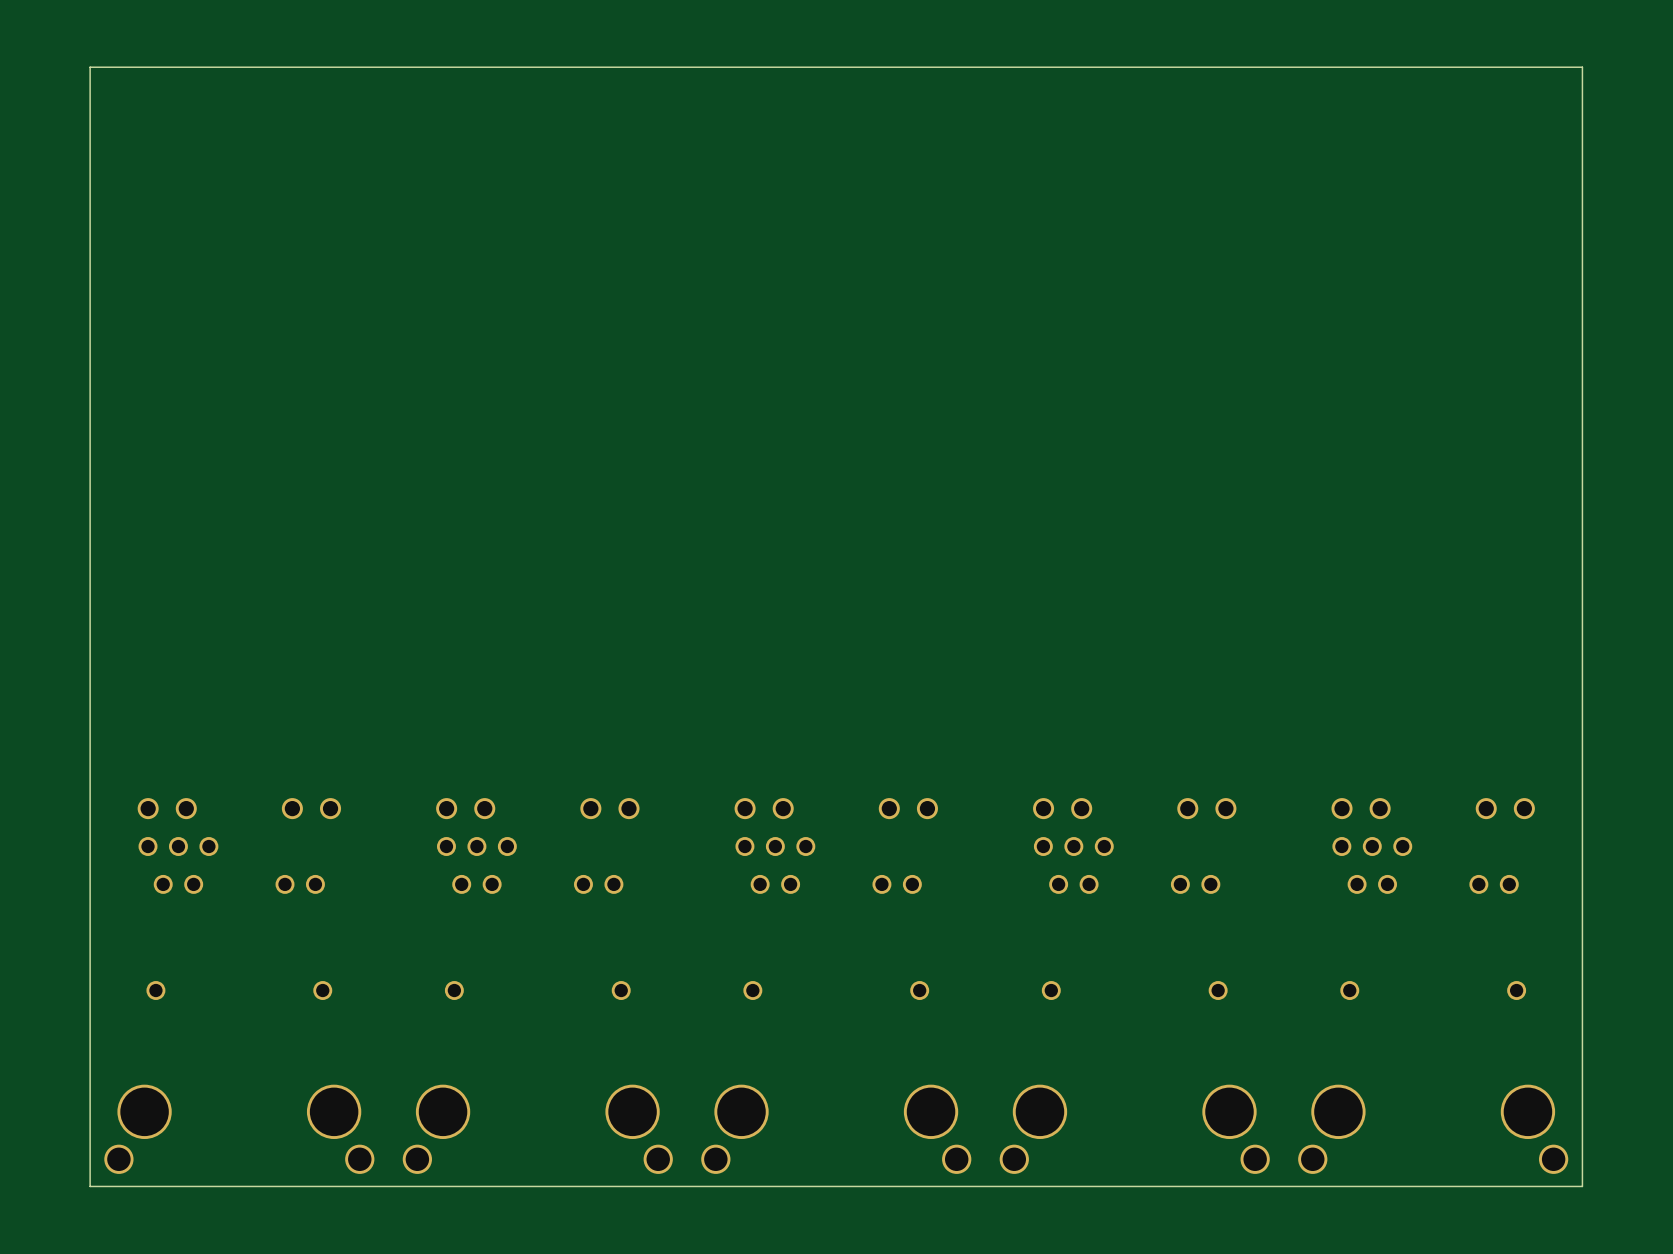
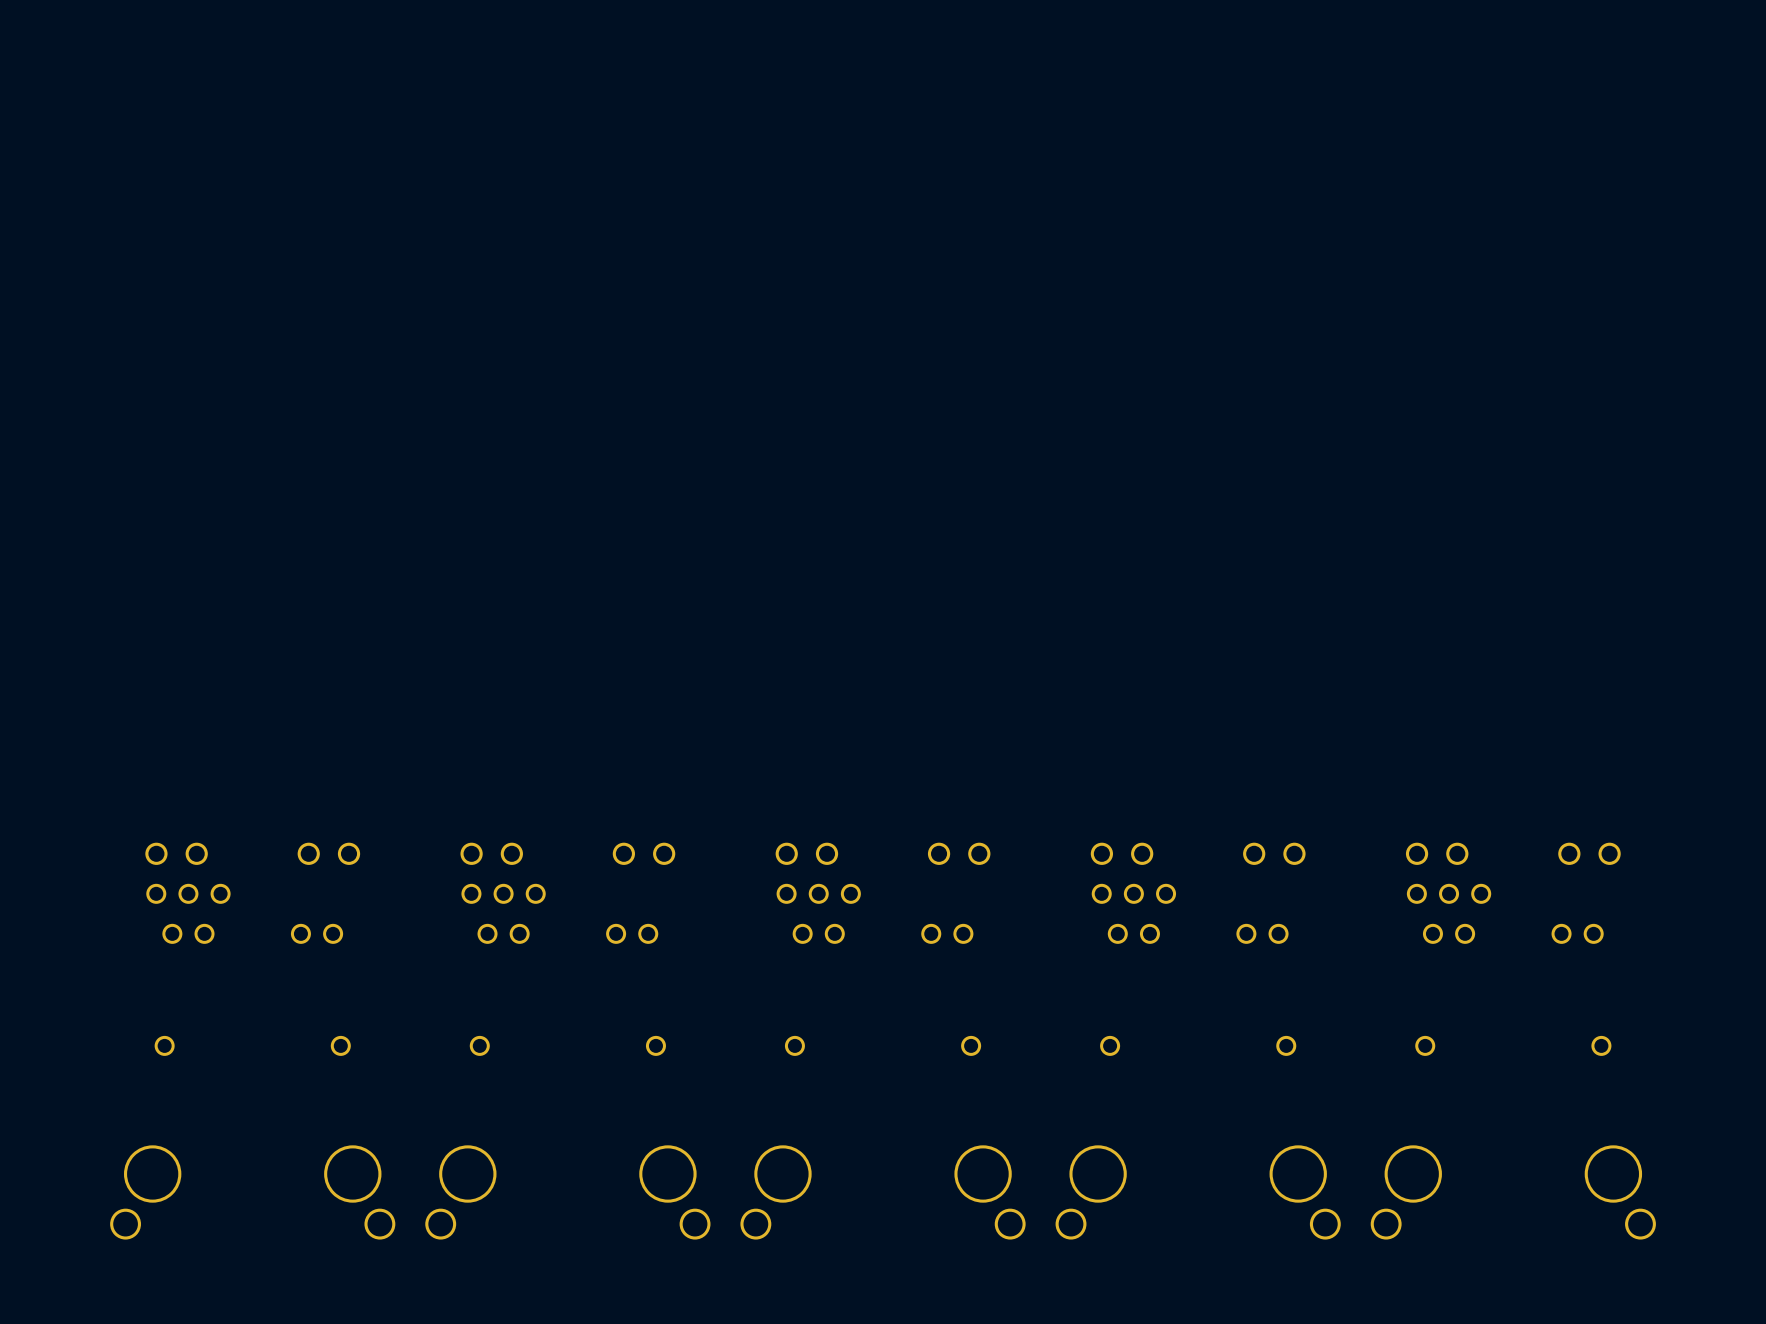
board edge: (1582, 67) (1582, 1186) (90, 1186) (90, 67) (1582, 67) -> none

